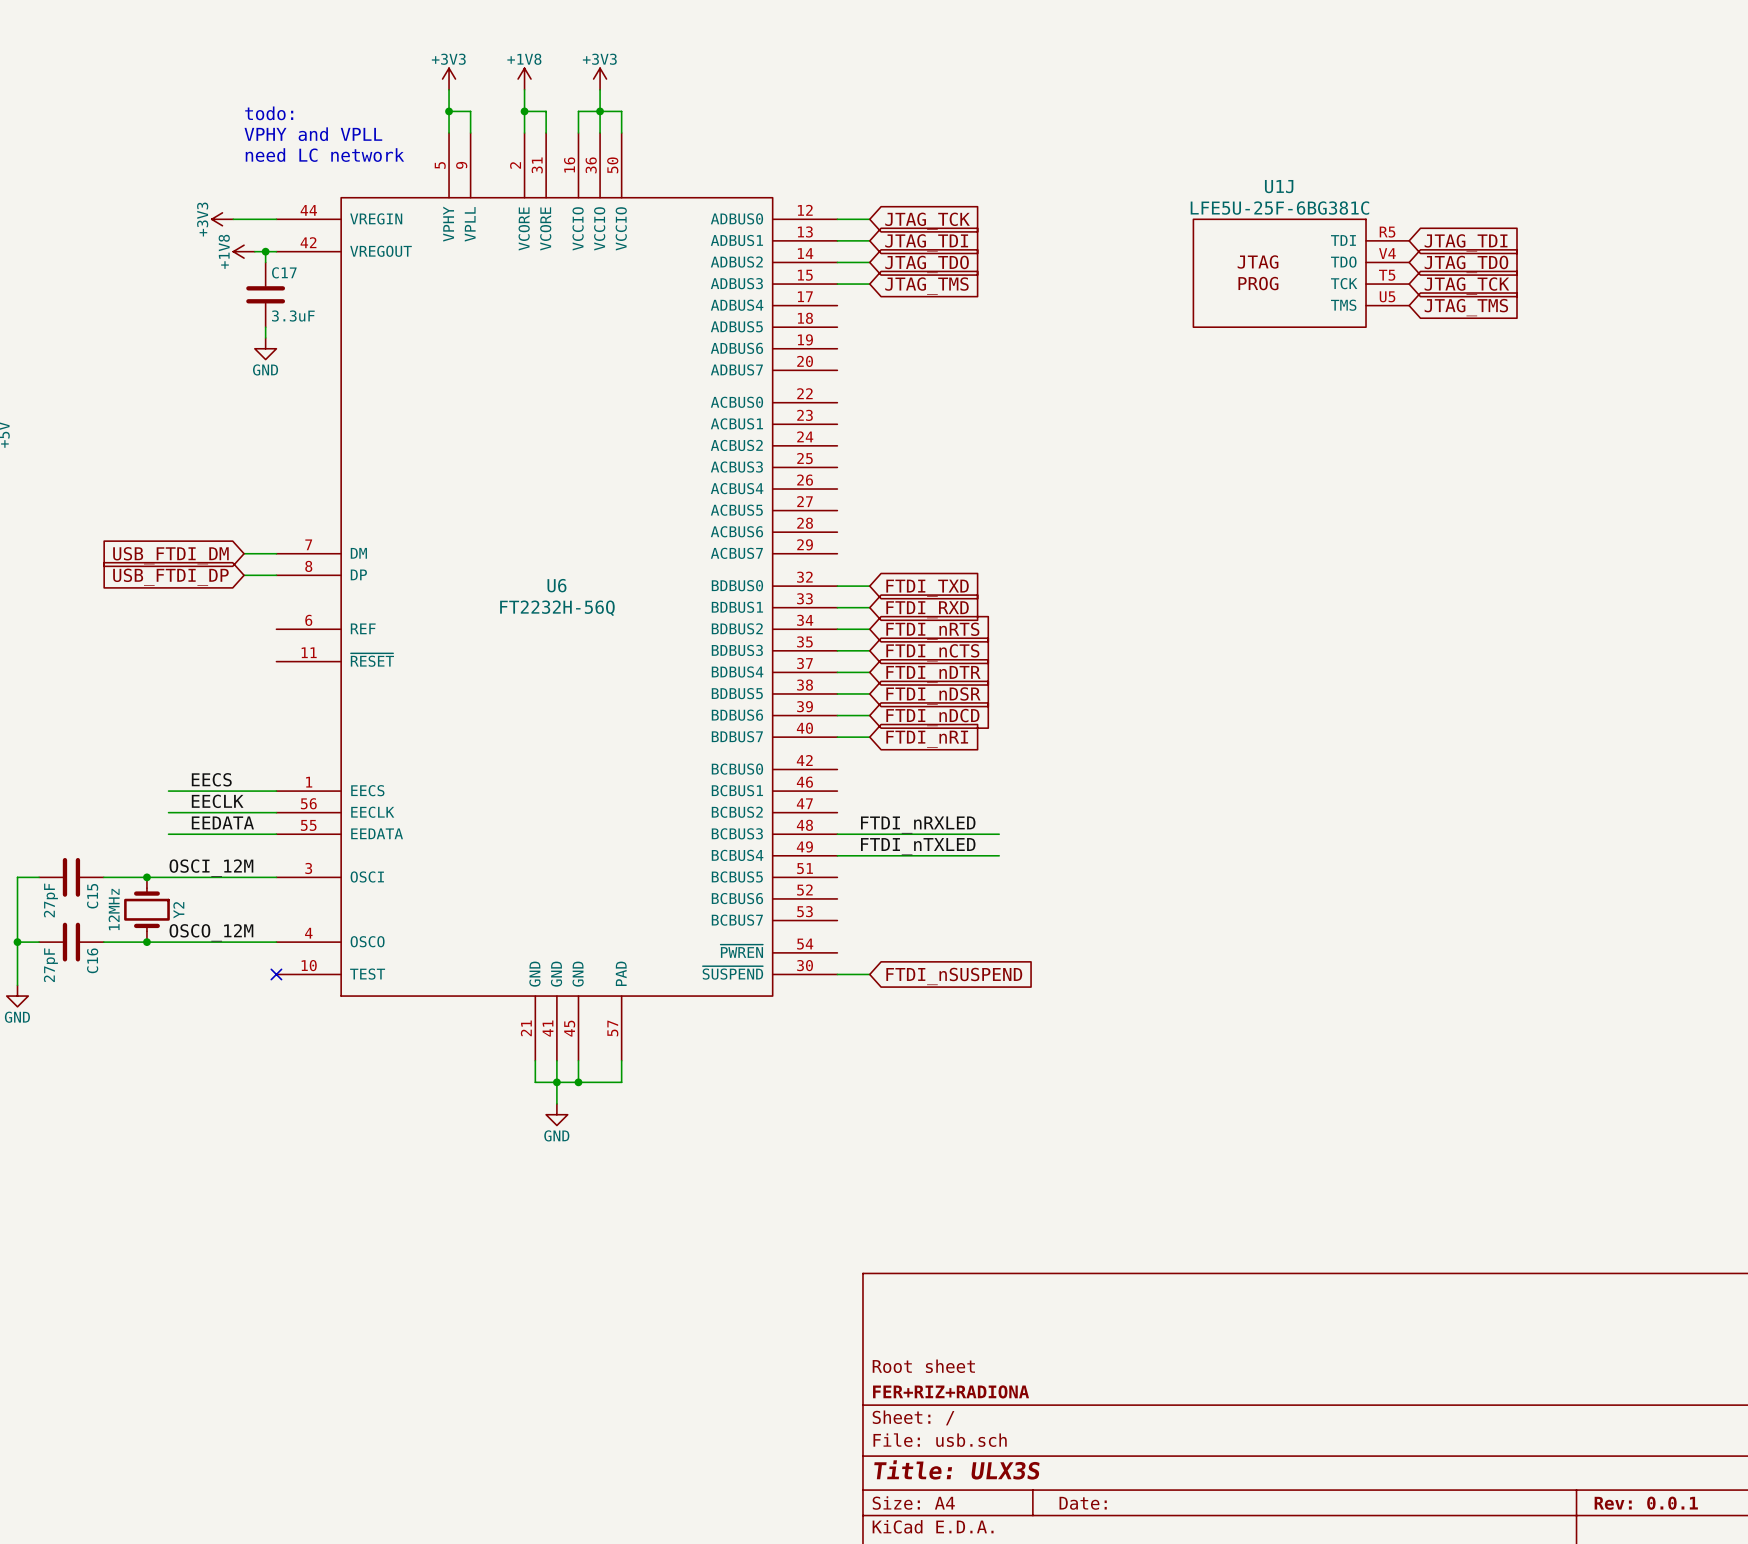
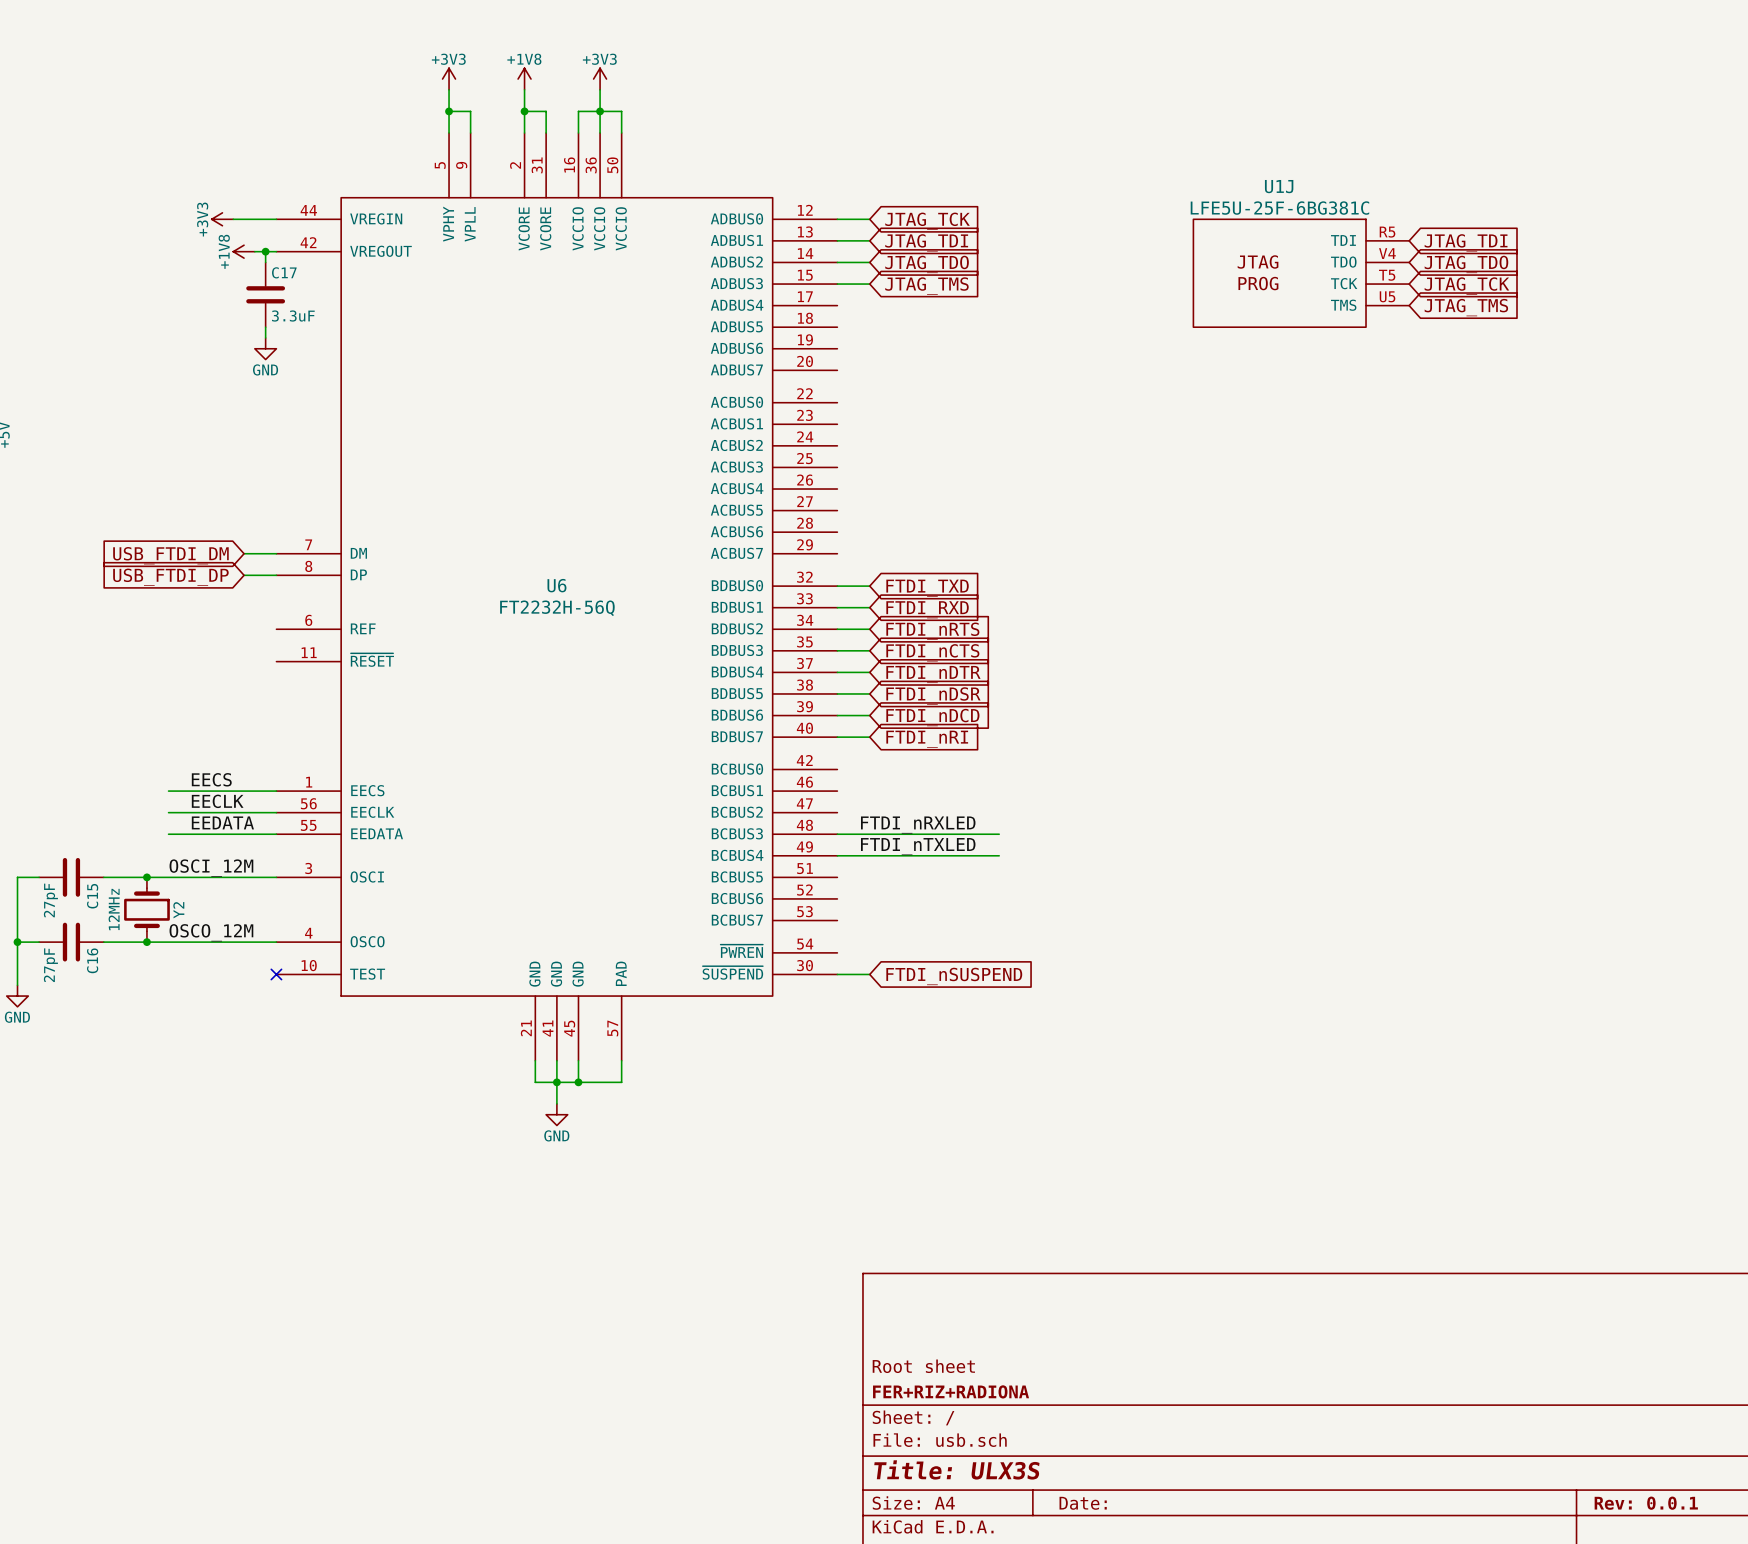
text: todo: (269, 113) -> none
text: VPHY and VPLL (313, 134) -> none
text: need LC network (324, 155) -> none

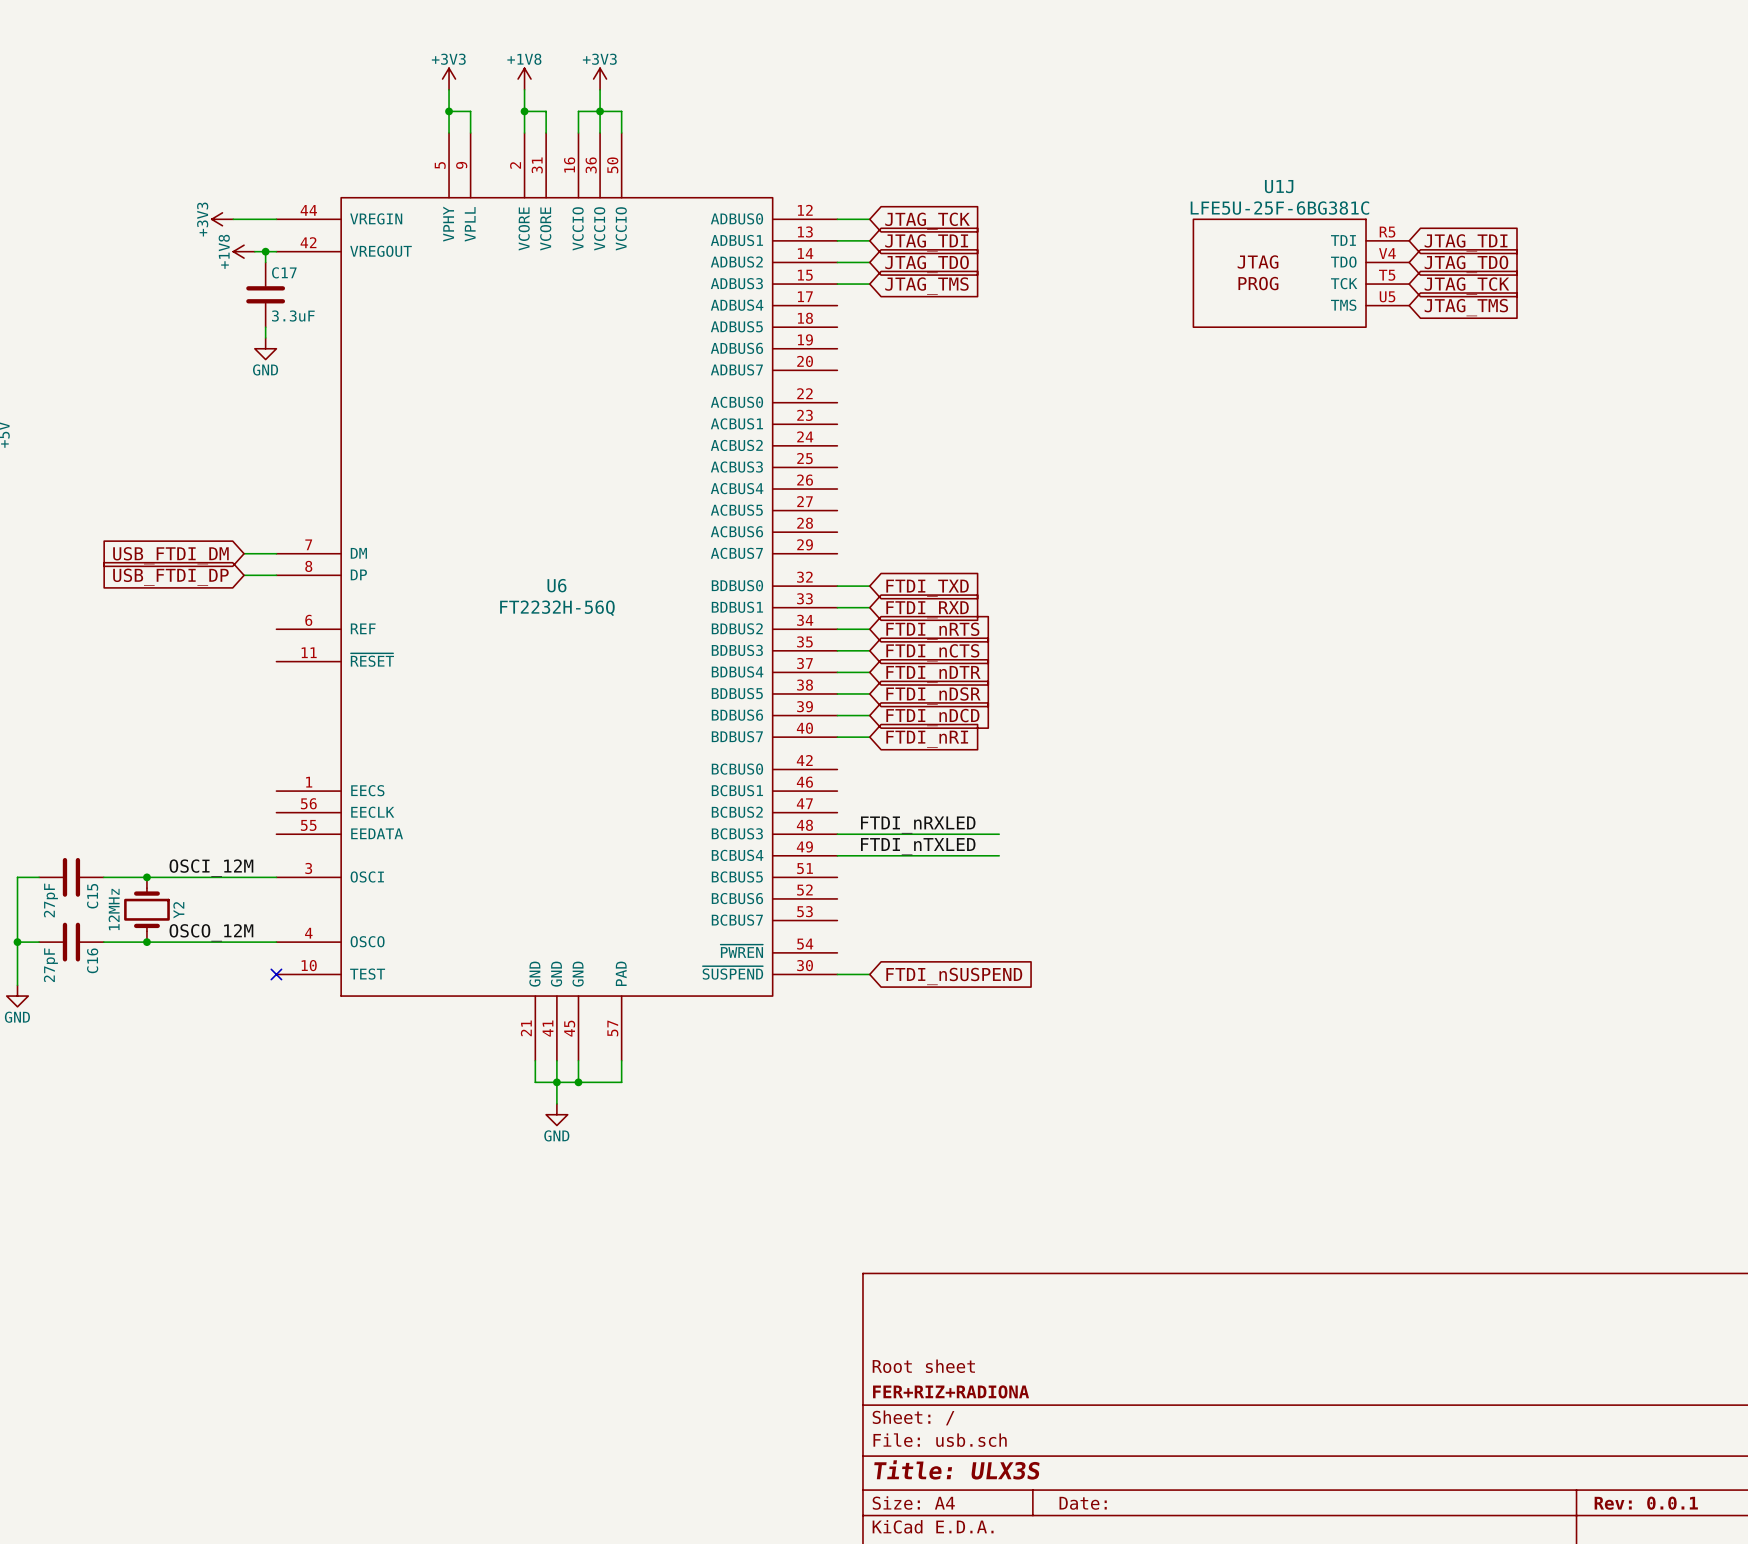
label: EECS (211, 779) -> none
wire: (168, 791) (276, 791) -> none
label: EECLK (217, 801) -> none
wire: (168, 812) (276, 812) -> none
label: EEDATA (222, 822) -> none
wire: (168, 834) (276, 834) -> none

